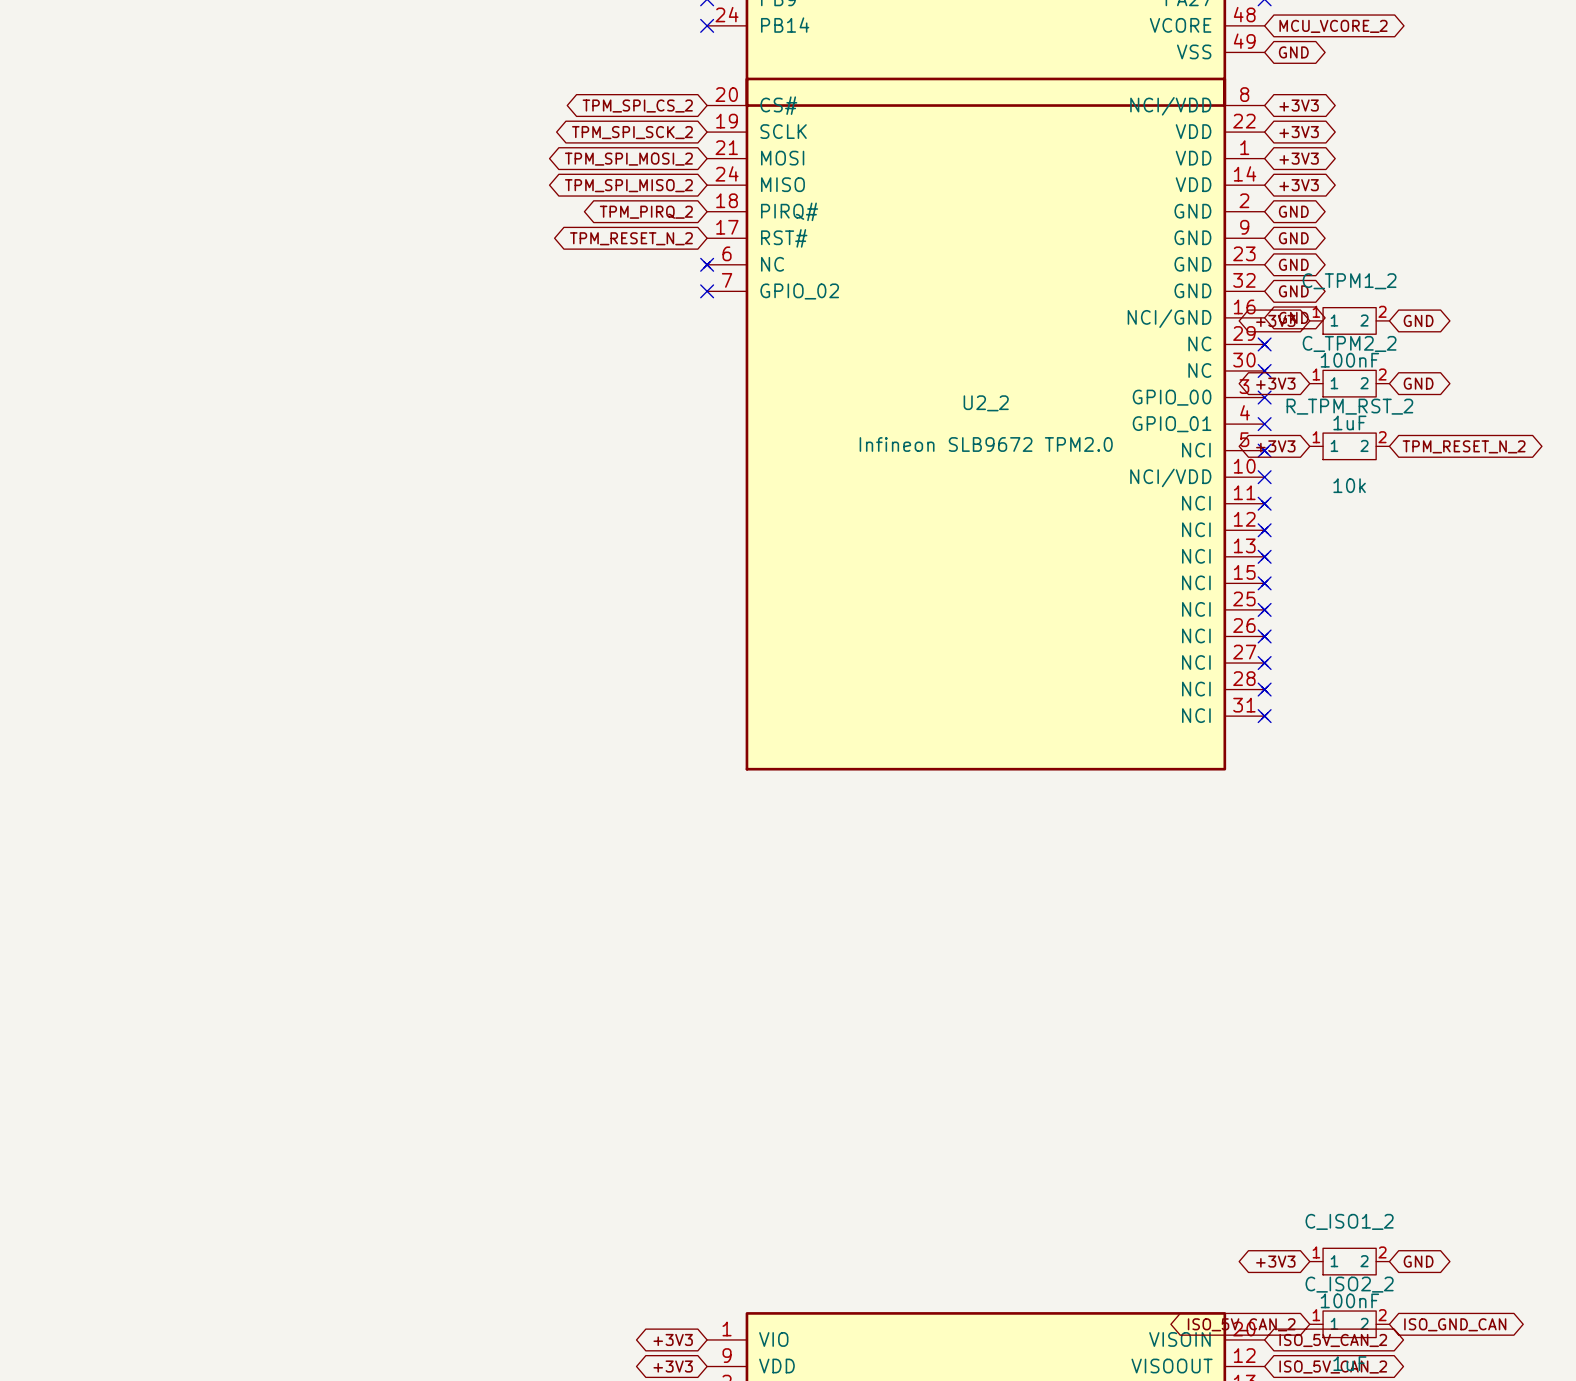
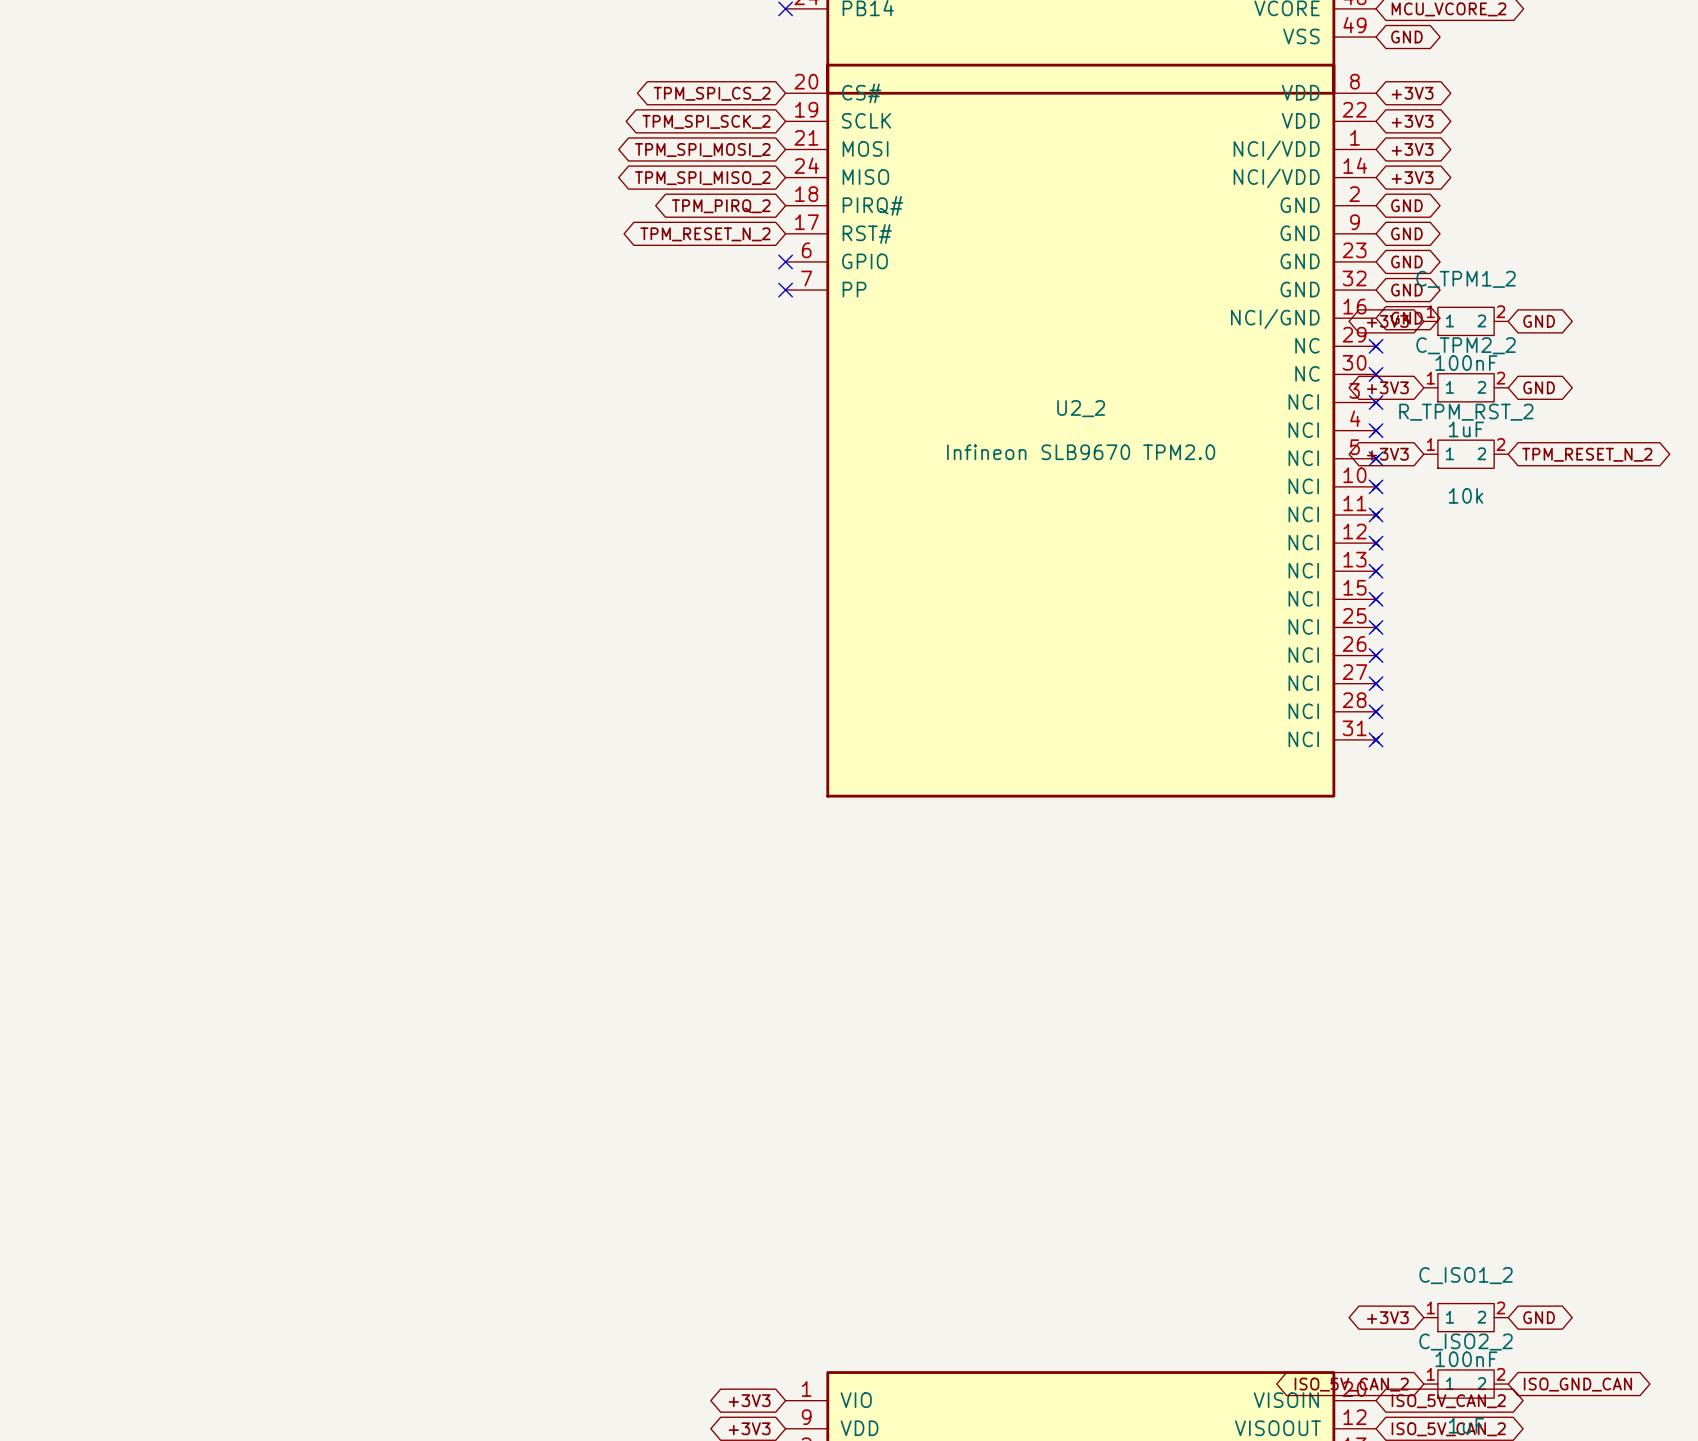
U2_2 symbol: [704, 77, 1268, 771] -> [785, 63, 1380, 798]
U2_2 value: Infineon SLB9672 TPM2.0 (986, 444) -> Infineon SLB9670 TPM2.0 (1081, 452)

